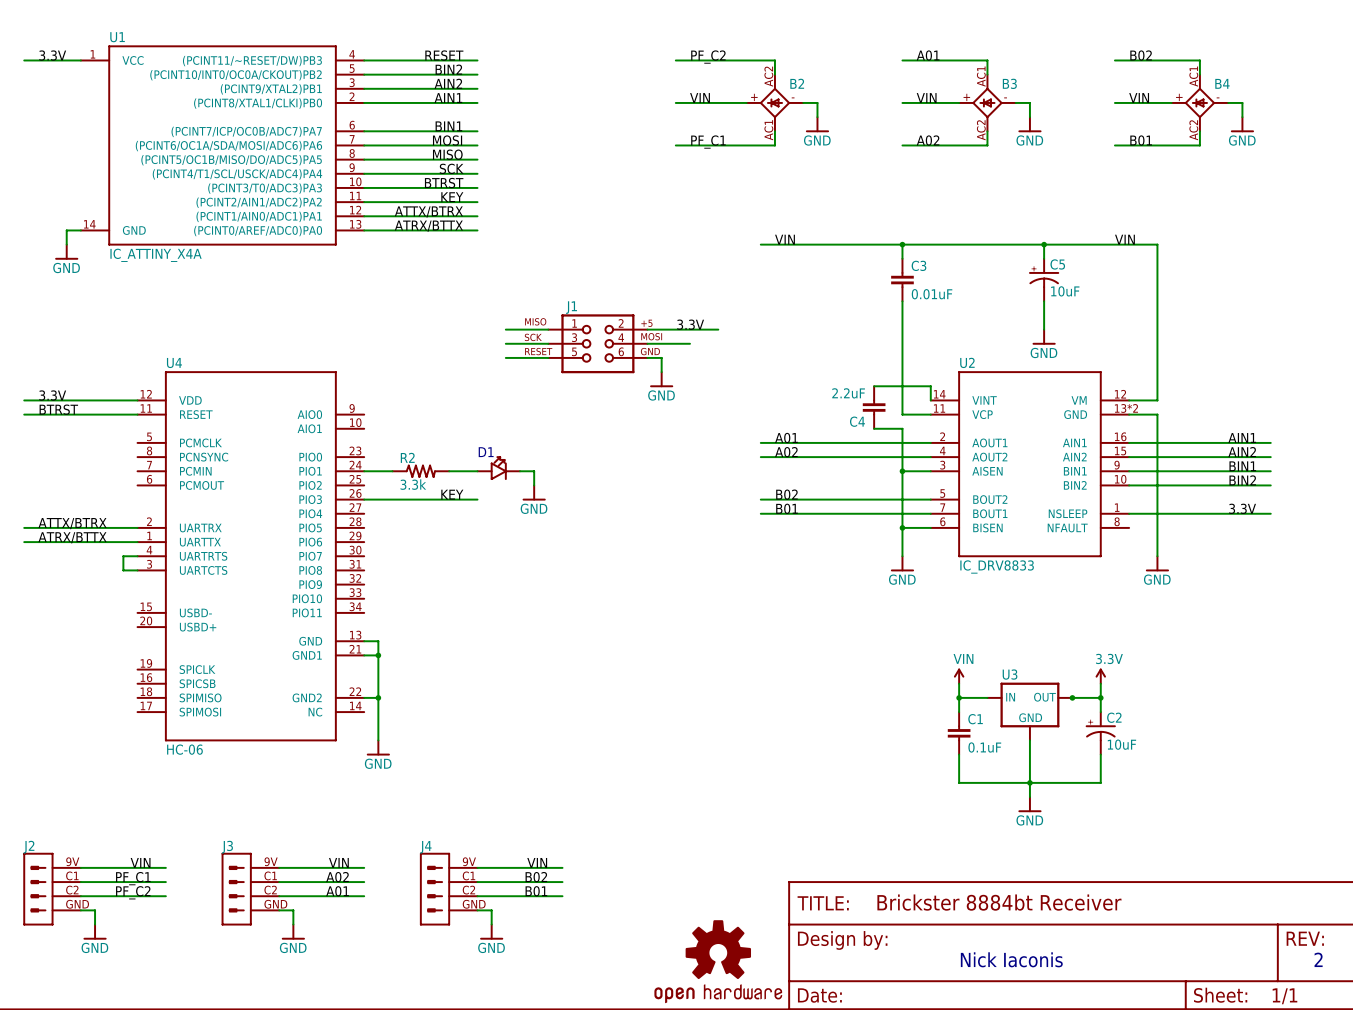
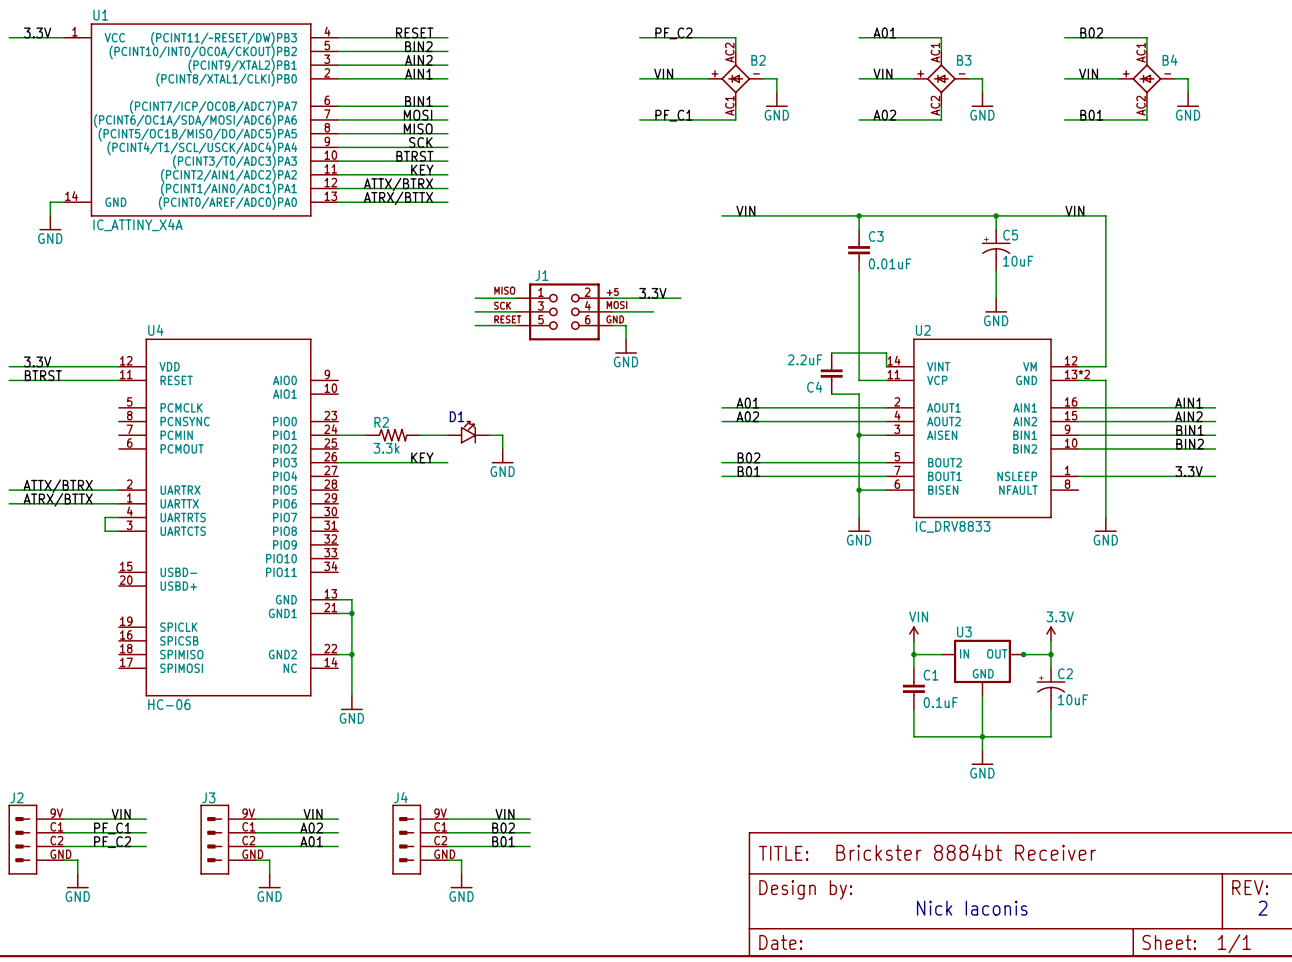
part: (718, 961) -> none

